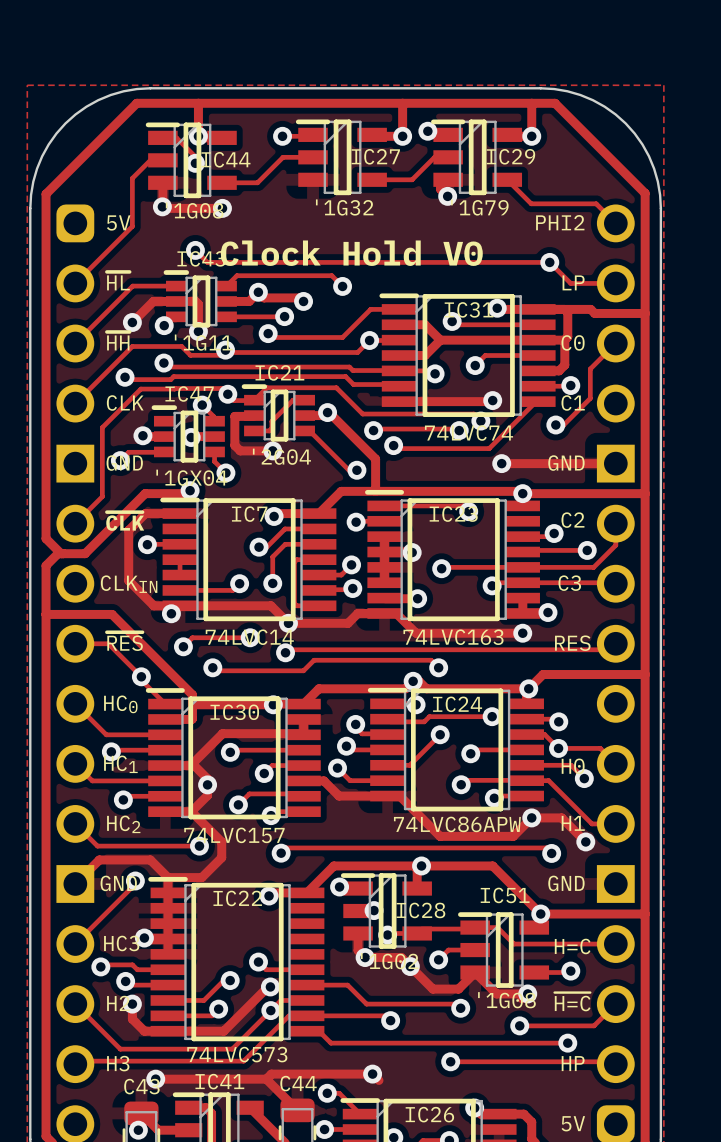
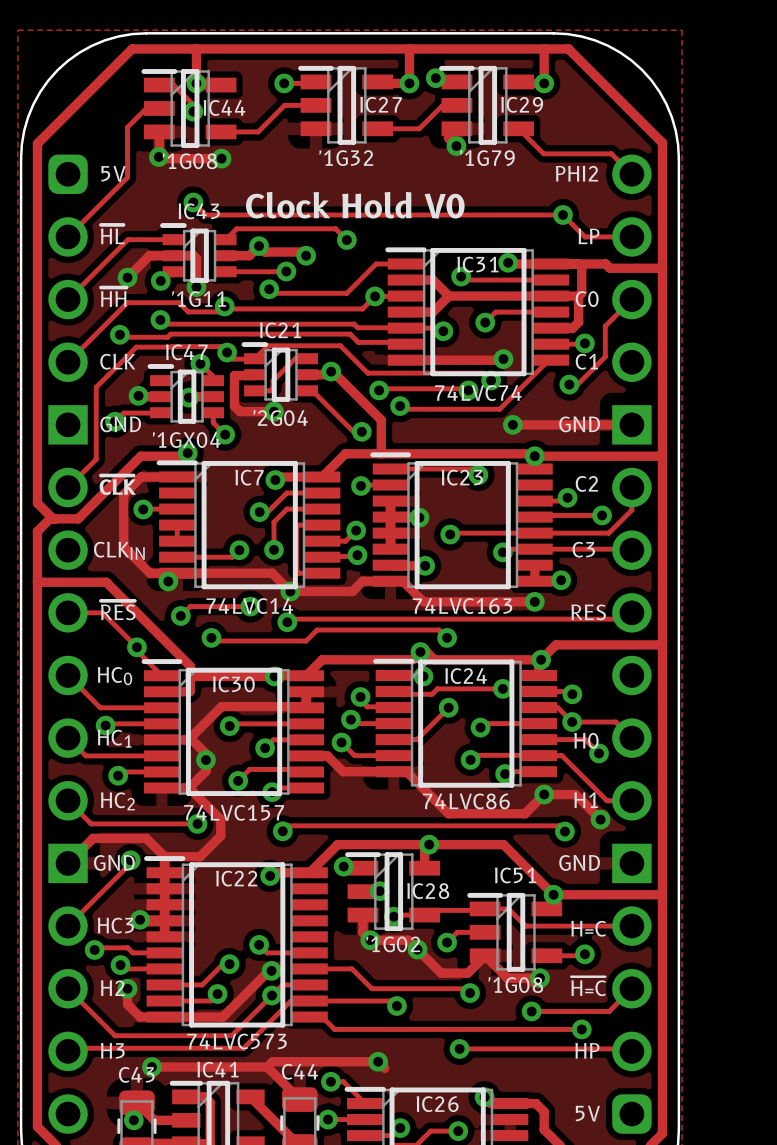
IC24 text: 74LVC86APW (457, 824) -> 74LVC86 (466, 801)

